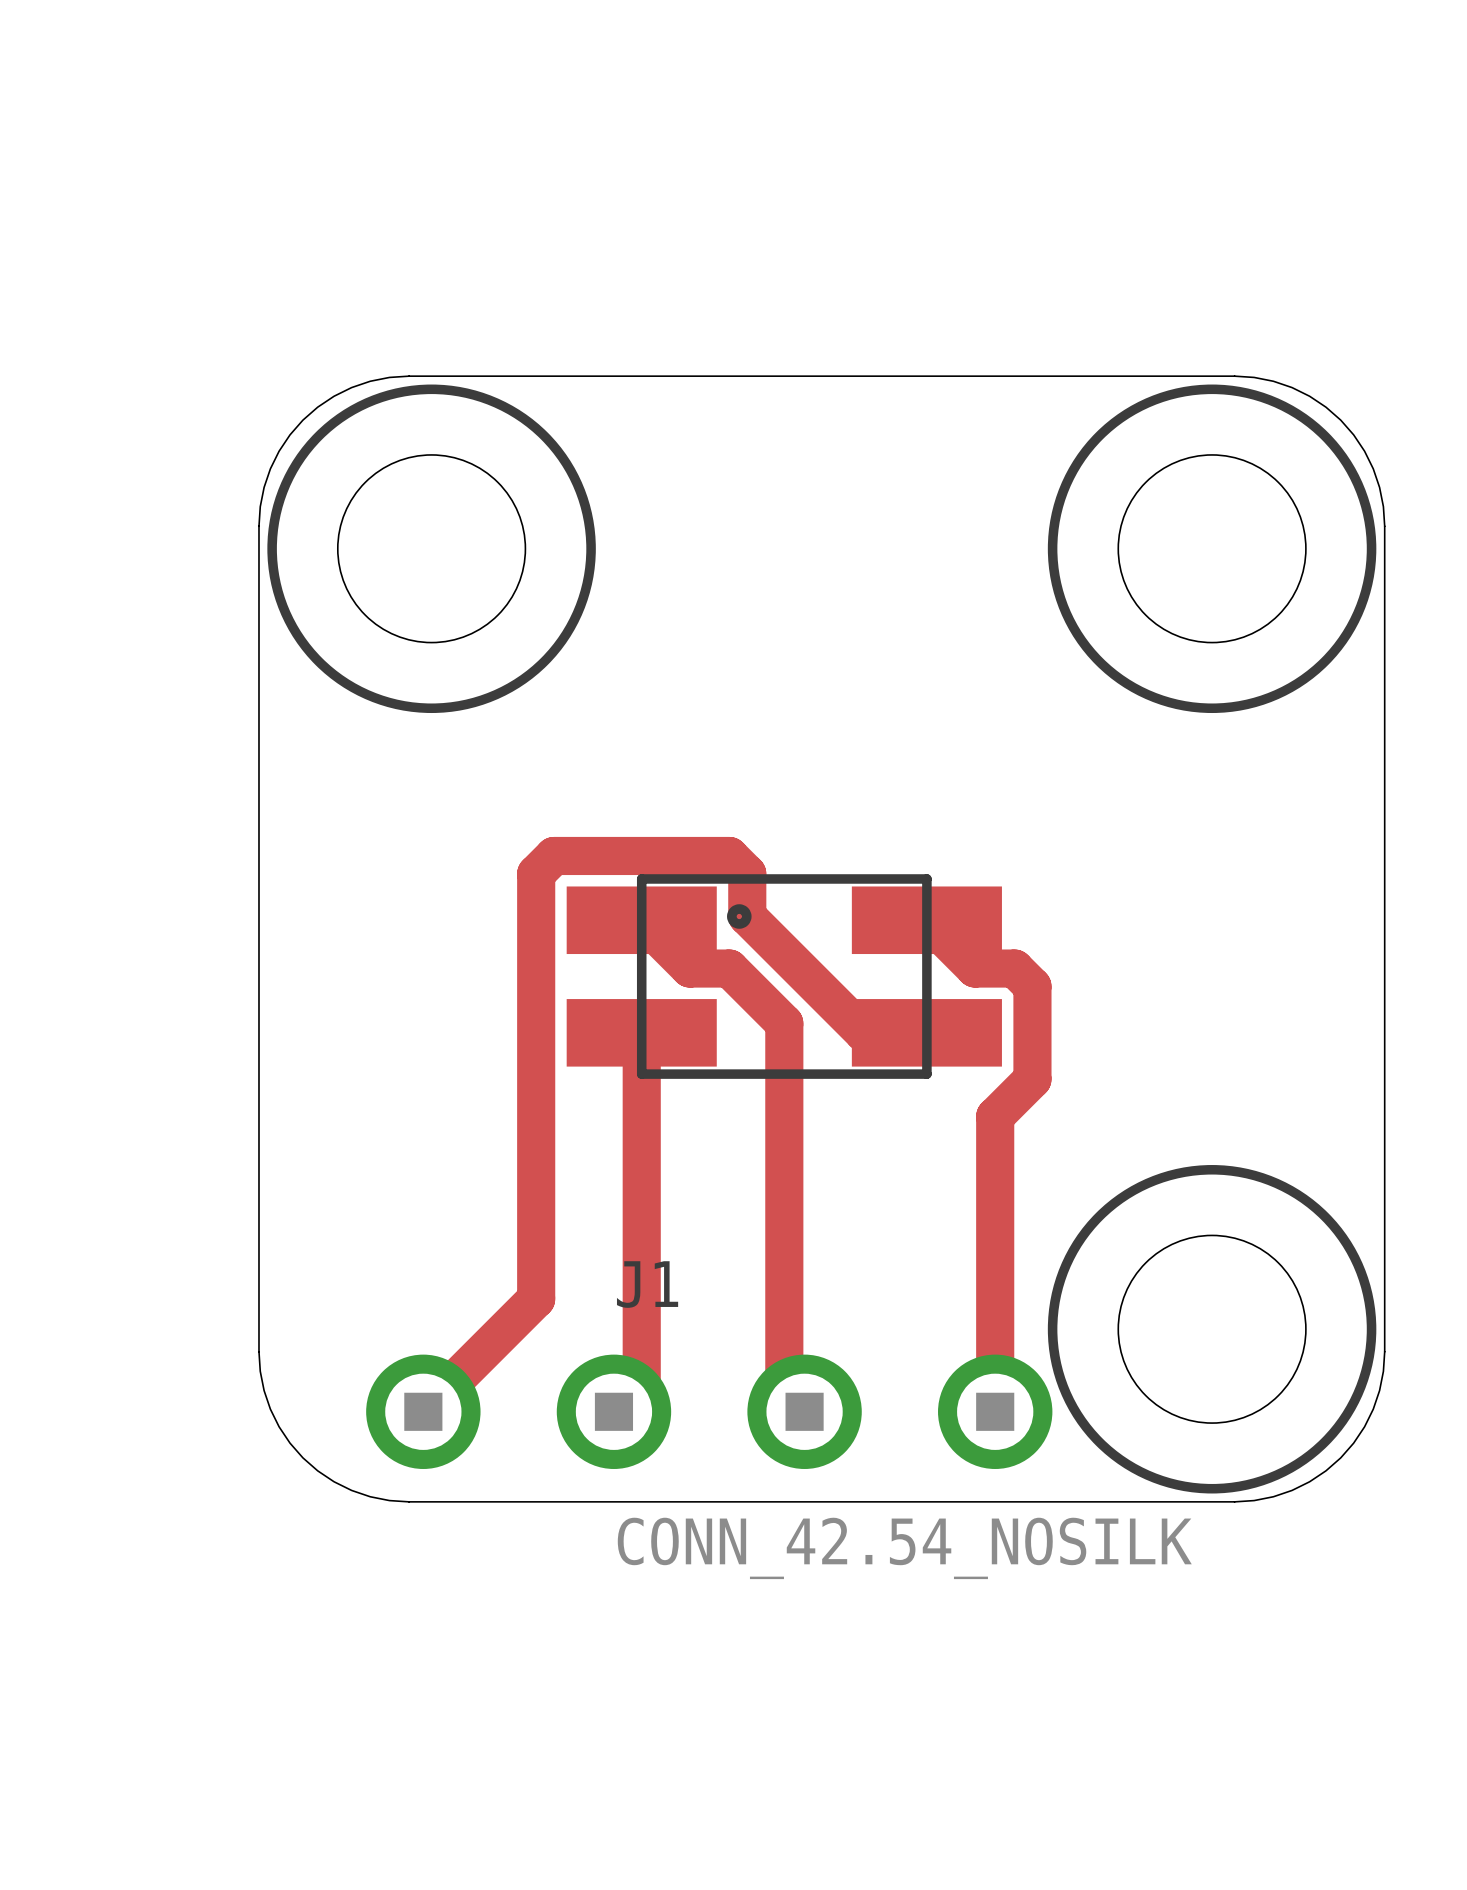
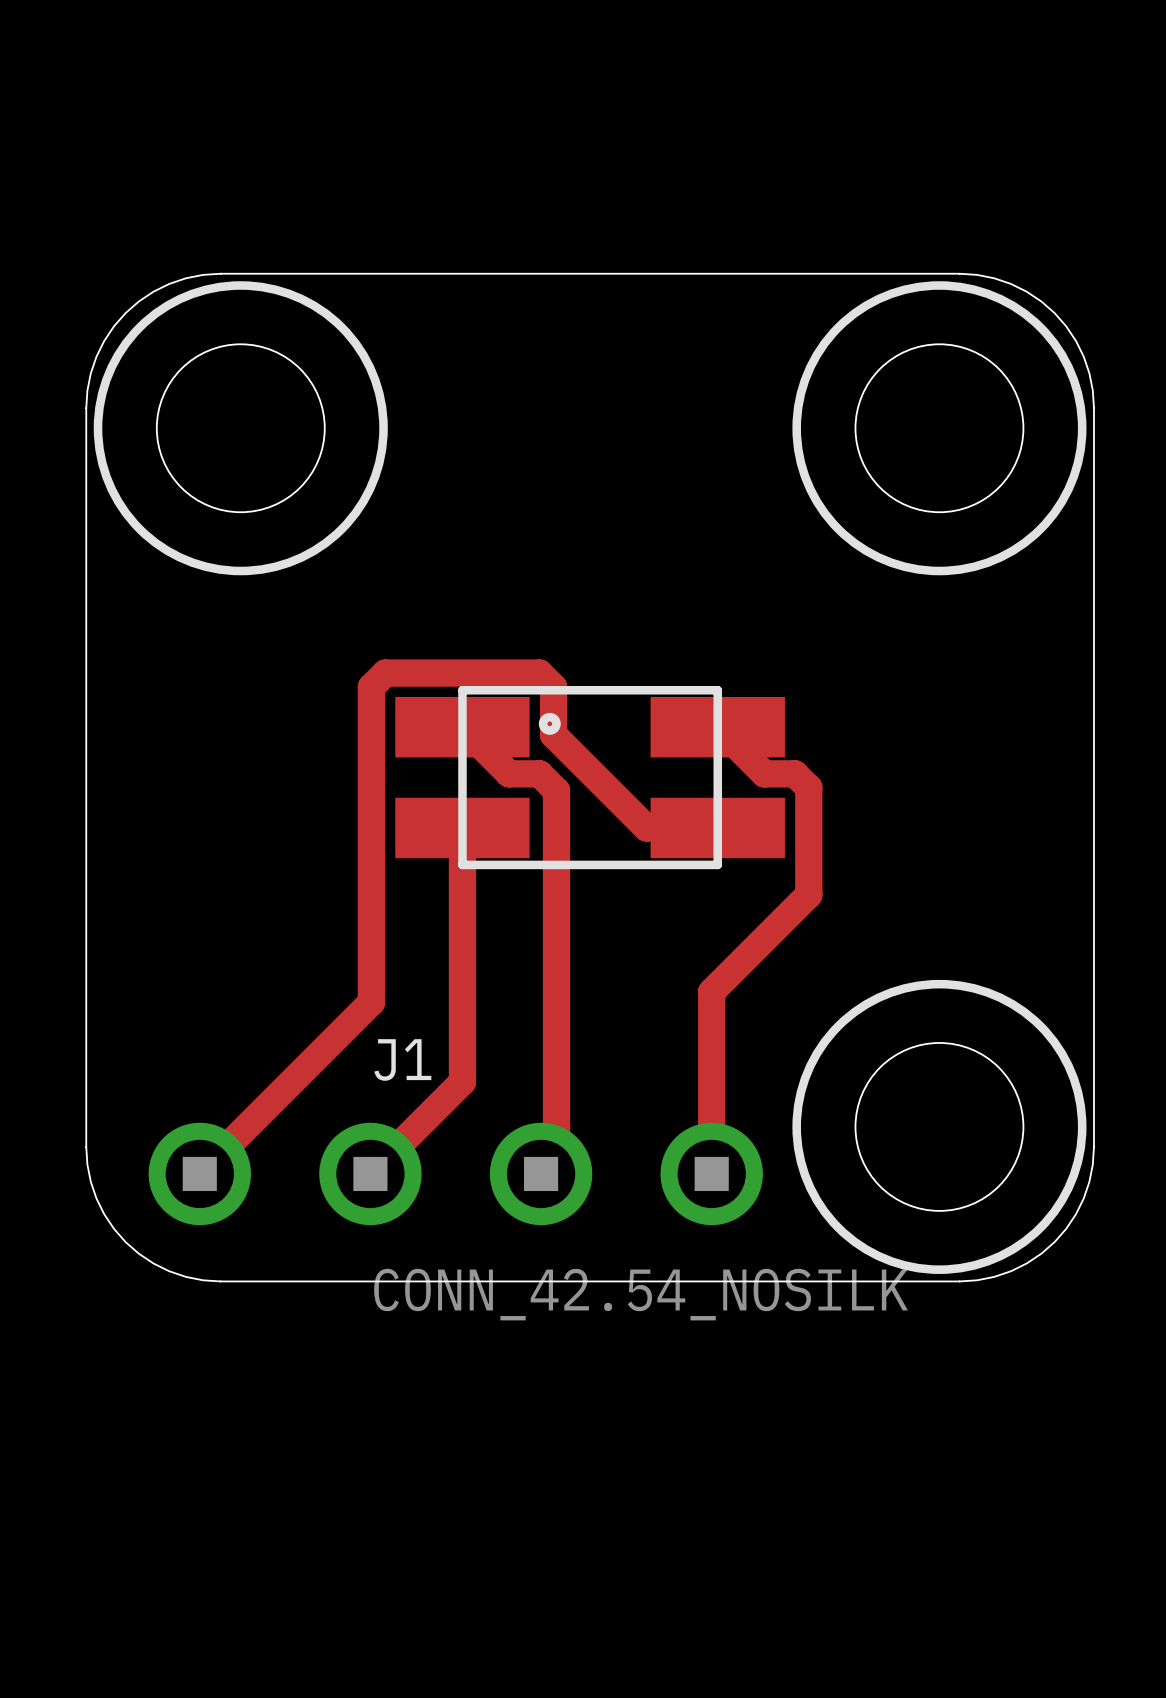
track: none -> (717, 727) (764, 773) (794, 773) (808, 787) (808, 894) (711, 991) (711, 1173)
track: (641, 920) (690, 968) (729, 968) (784, 1023) -> (462, 727) (509, 773) (539, 773) (556, 790) (556, 853)
track: (926, 920) (975, 968) (1014, 968) (1032, 986) (1032, 1079) (995, 1116) (995, 1411) -> none
part position: (784, 976) -> (590, 777)
track: none -> (462, 827) (462, 1081) (370, 1173)
track: none -> (717, 827) (646, 827) (553, 734) (553, 687) (539, 673) (385, 673) (371, 687) (371, 1002) (199, 1173)
track width: thick (784, 1023) (784, 1364) -> thin (556, 853) (556, 1158)
track: (641, 1032) (641, 1384) (613, 1411) -> none
track: (926, 1032) (863, 1032) (747, 916) (747, 873) (729, 855) (554, 855) (536, 873) (536, 1298) (423, 1411) -> none
J1 position: (709, 1411) -> (455, 1173)

